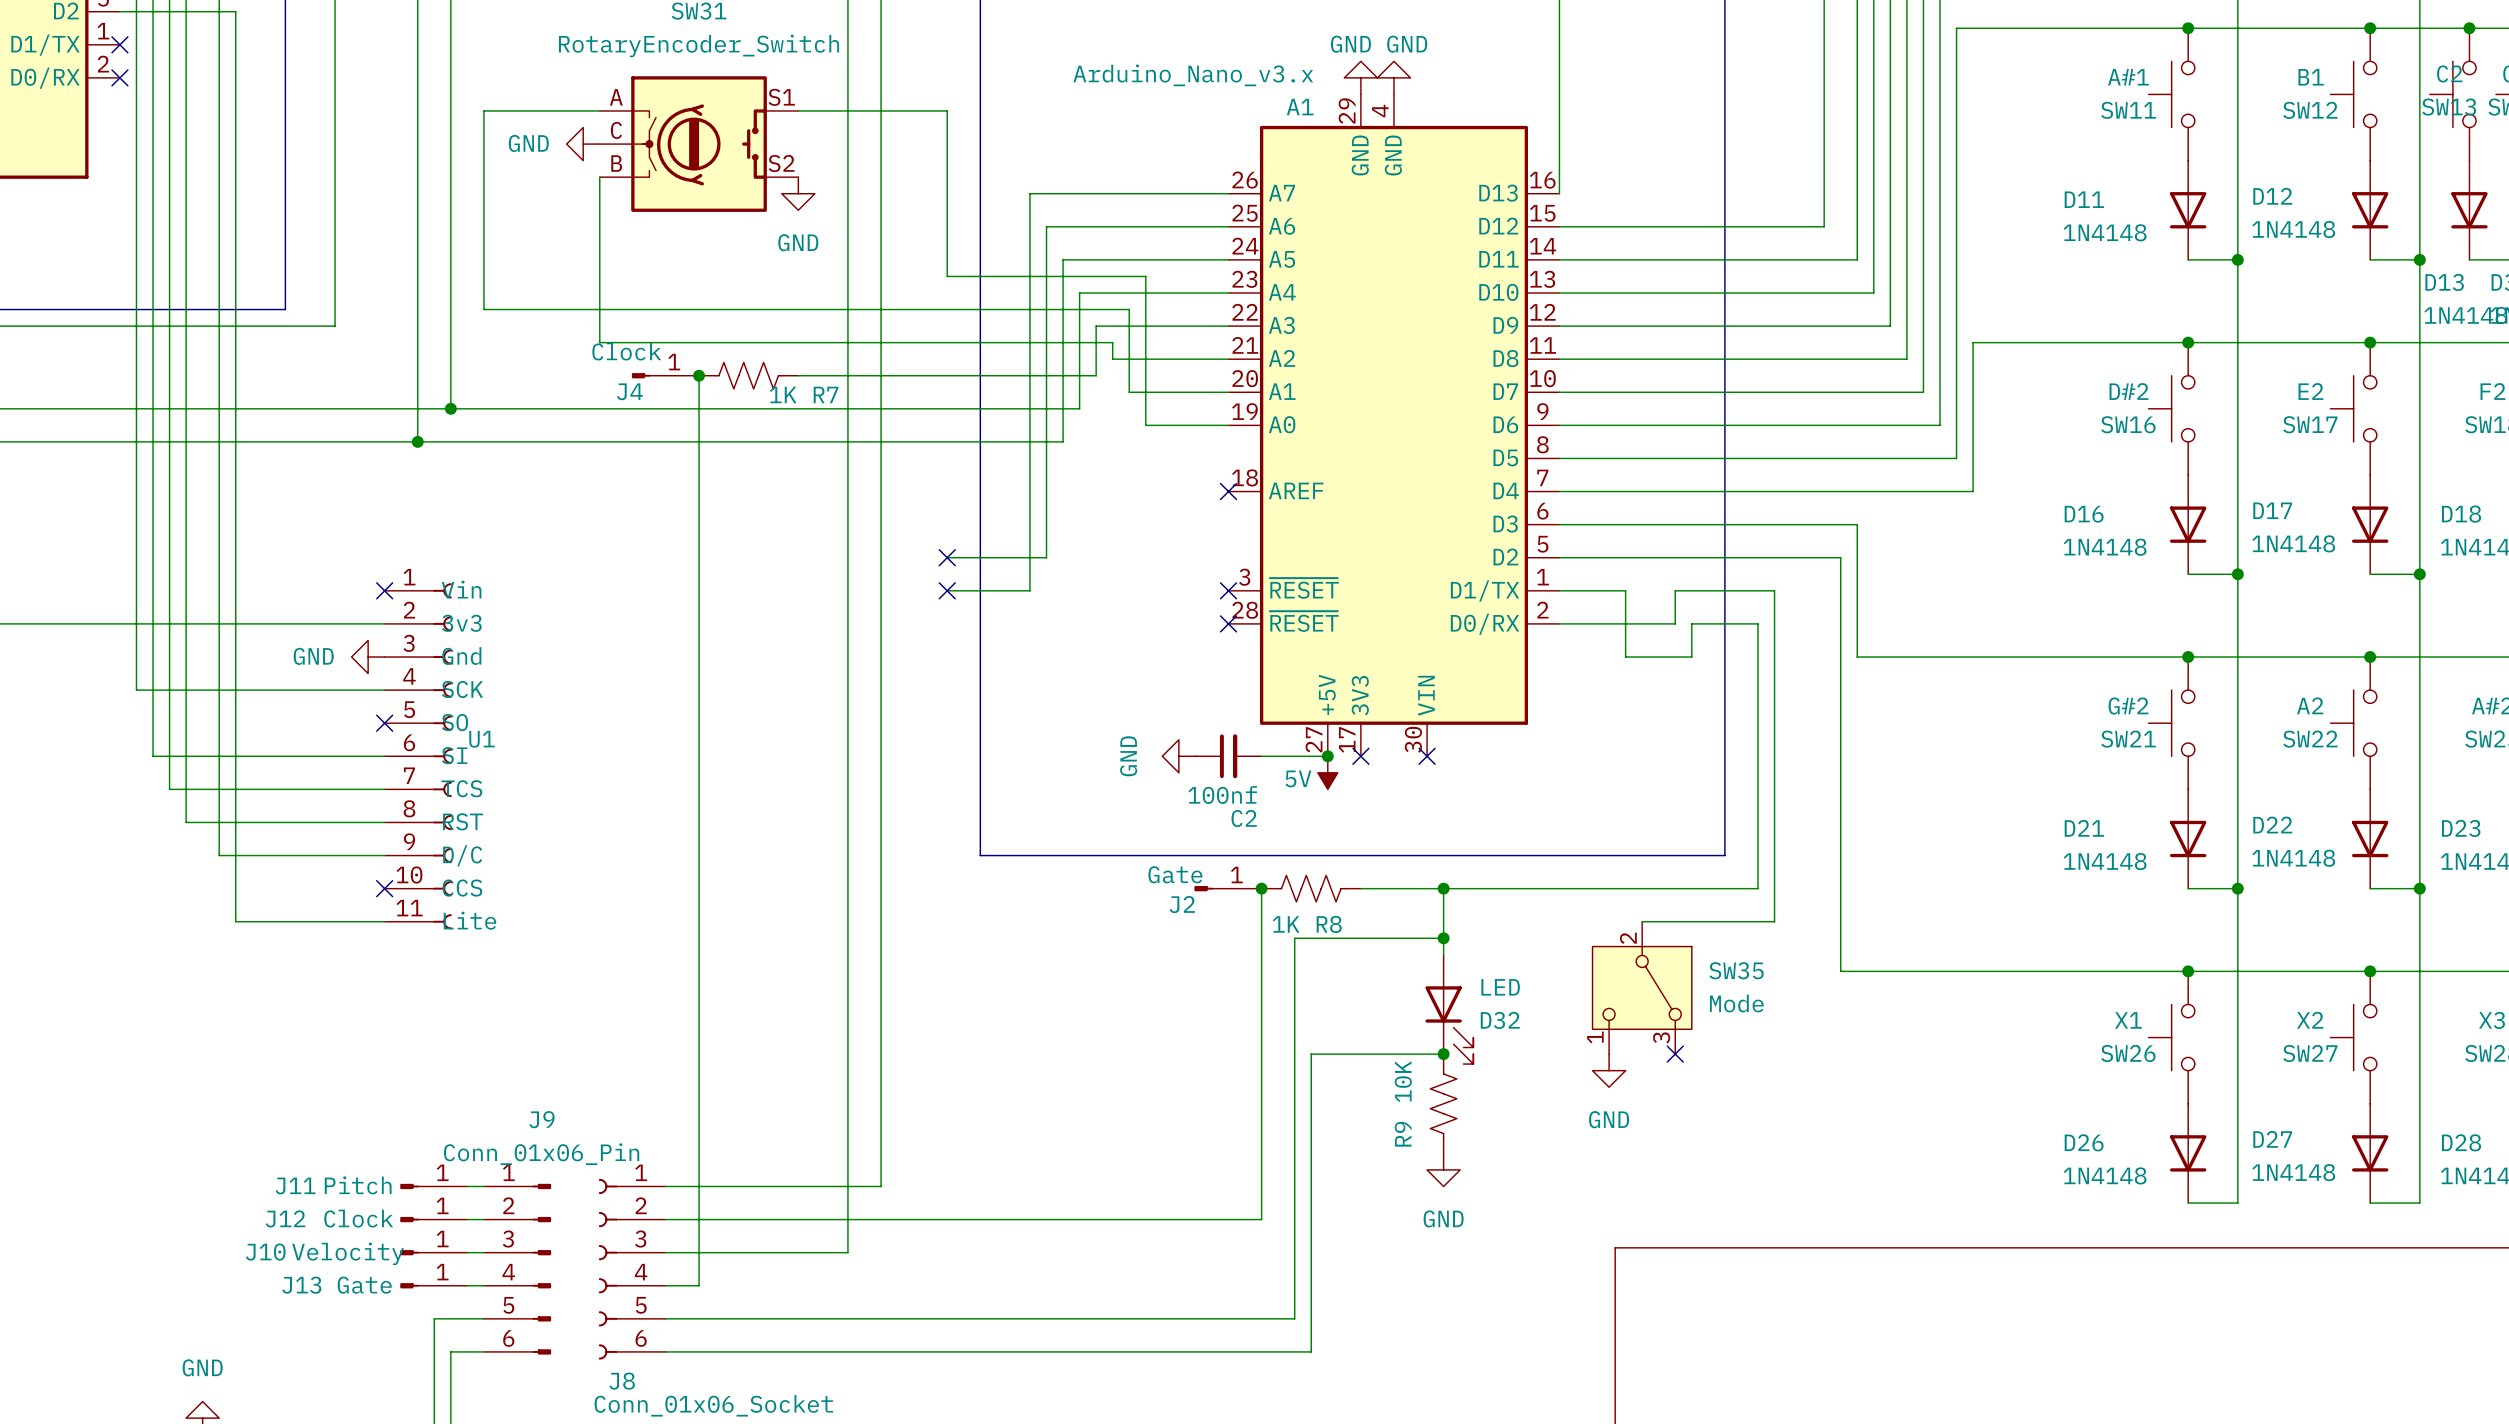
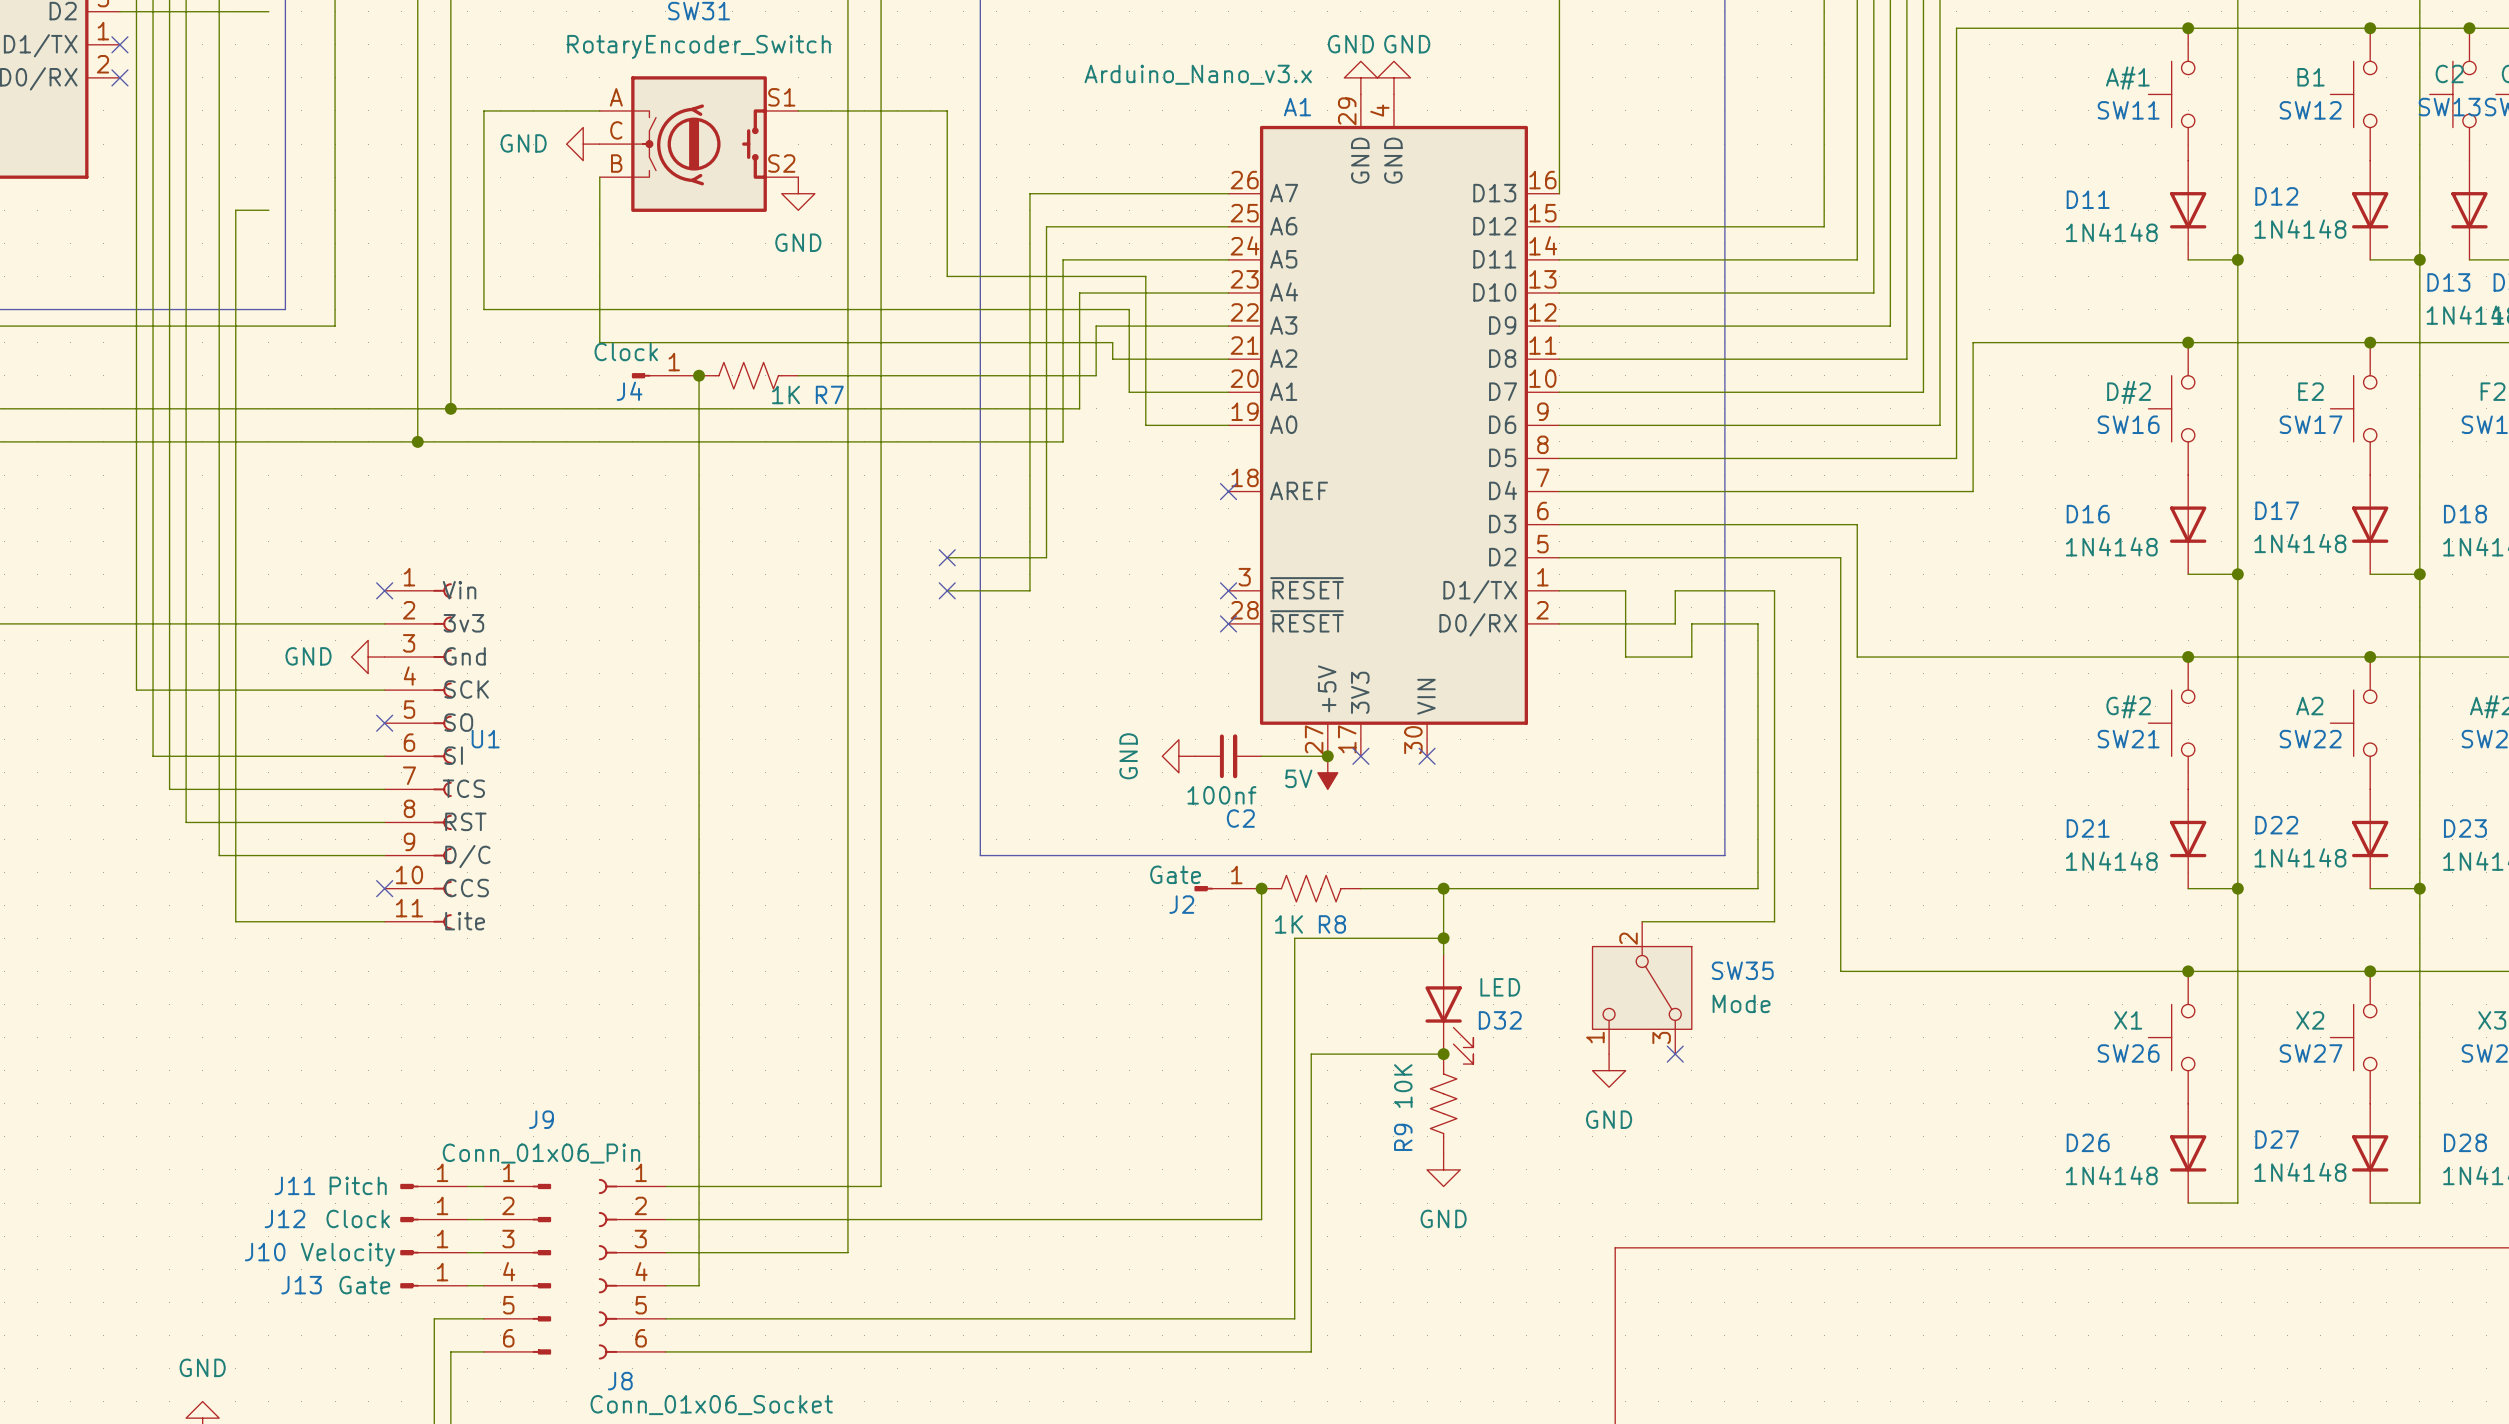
wire: (235, 11) (235, 210) -> (235, 11) (268, 11)
wire: none -> (235, 210) (268, 210)

